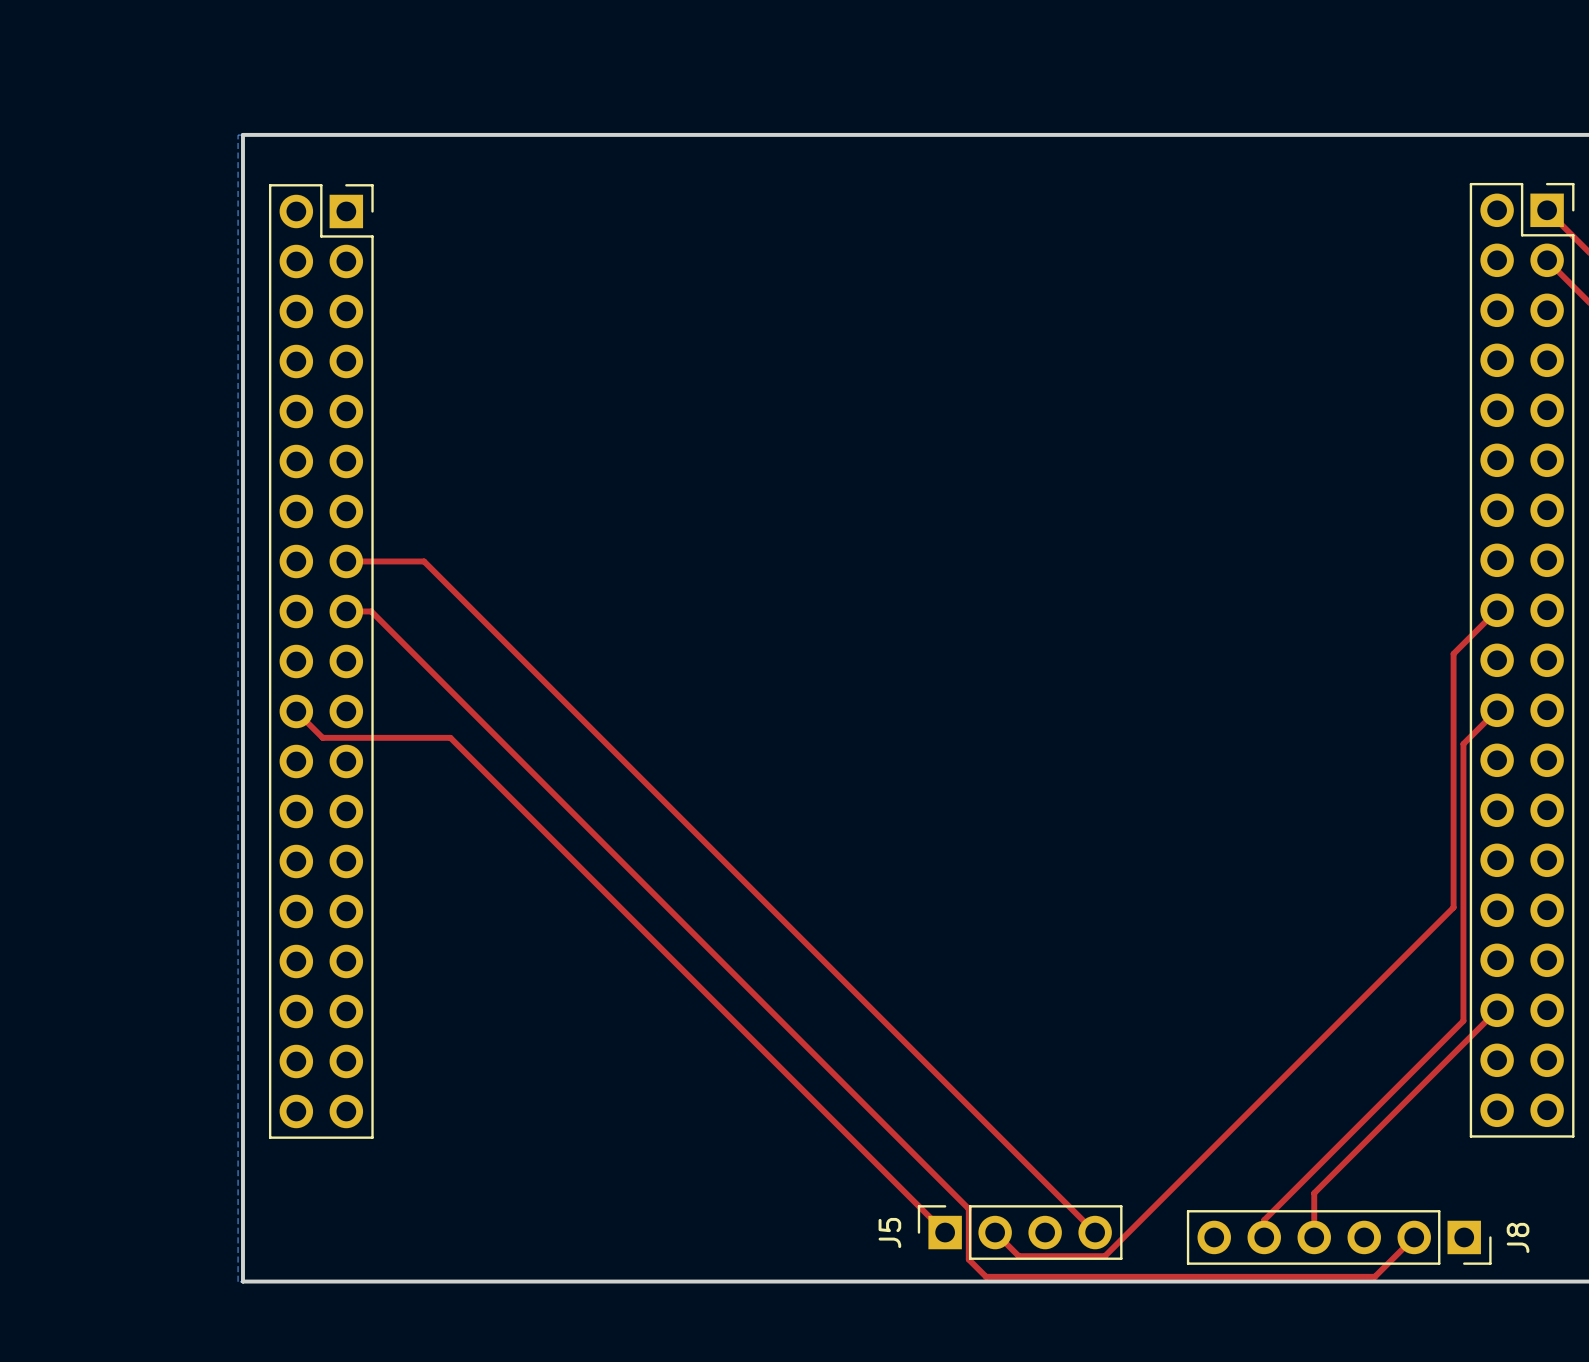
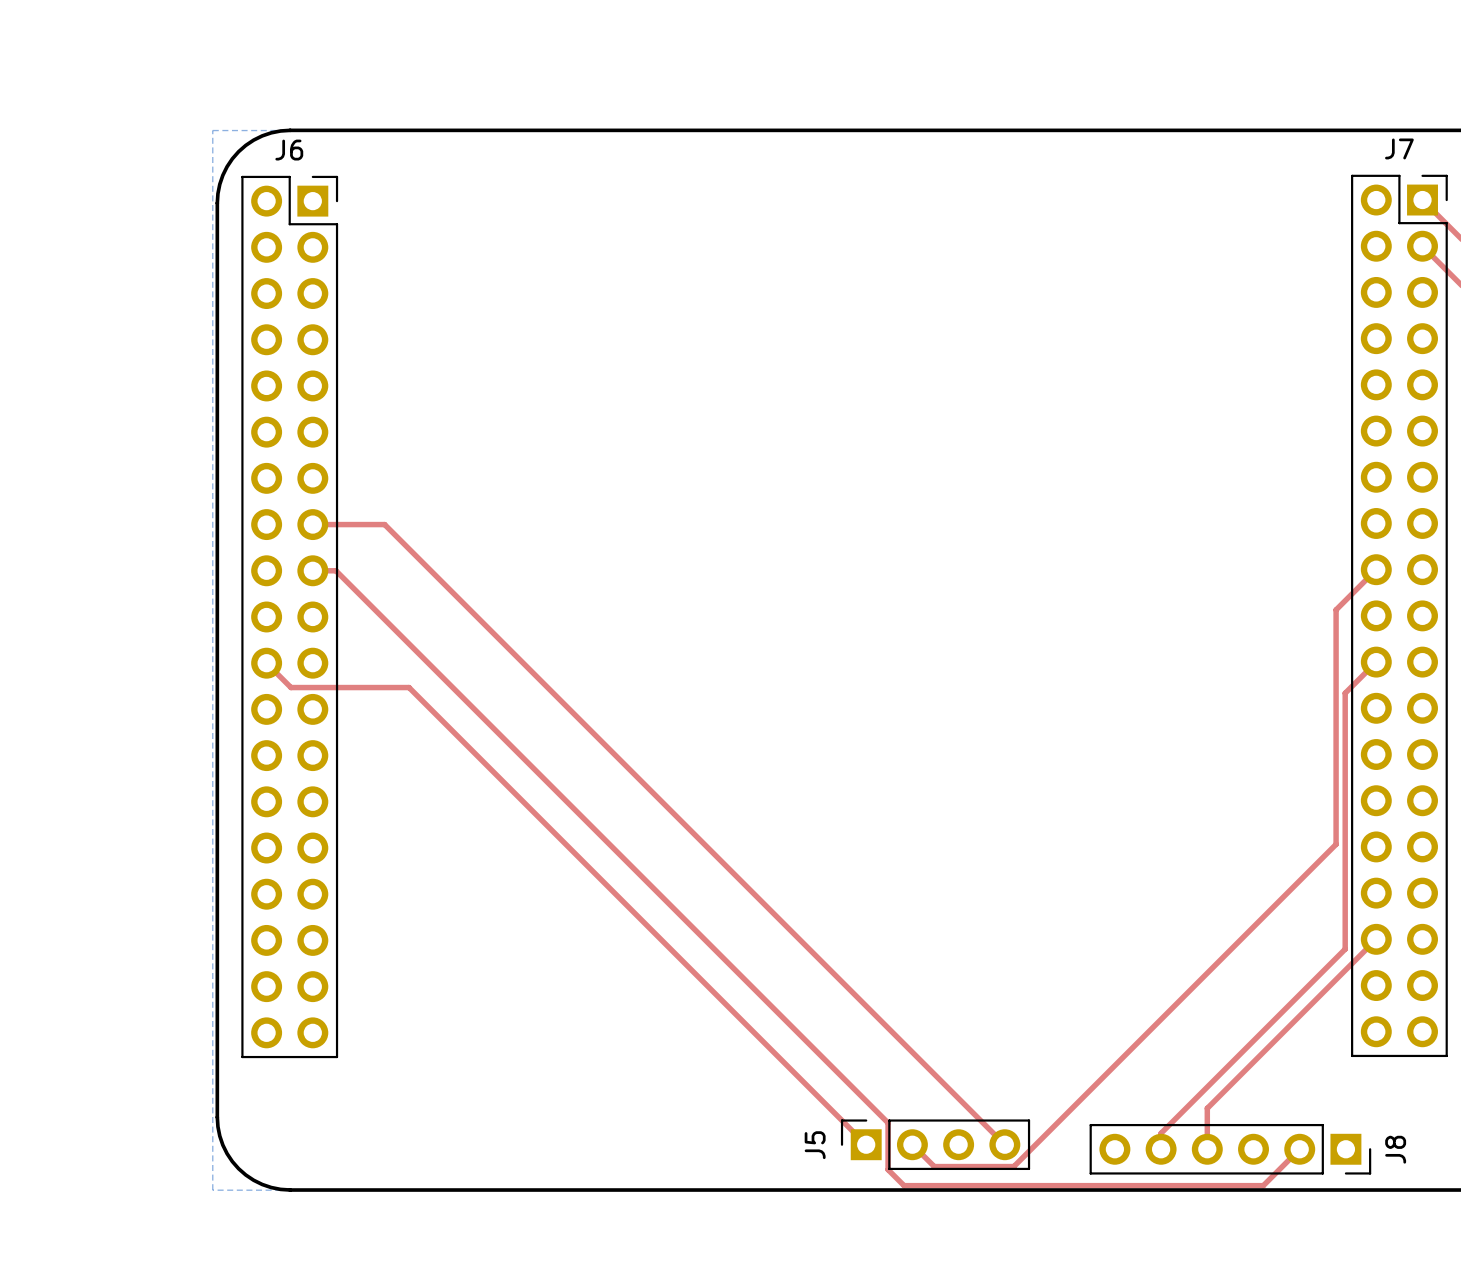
board edge: (321, 134) (242, 134) (242, 213) -> (290, 130) (262, 135) (238, 151) (222, 175) (217, 203)
J7 name: none -> J7 (1399, 148)
J6 name: none -> J6 (289, 150)
board edge: (242, 1202) (242, 1281) (321, 1281) -> (217, 1117) (222, 1145) (238, 1168) (262, 1184) (290, 1190)

